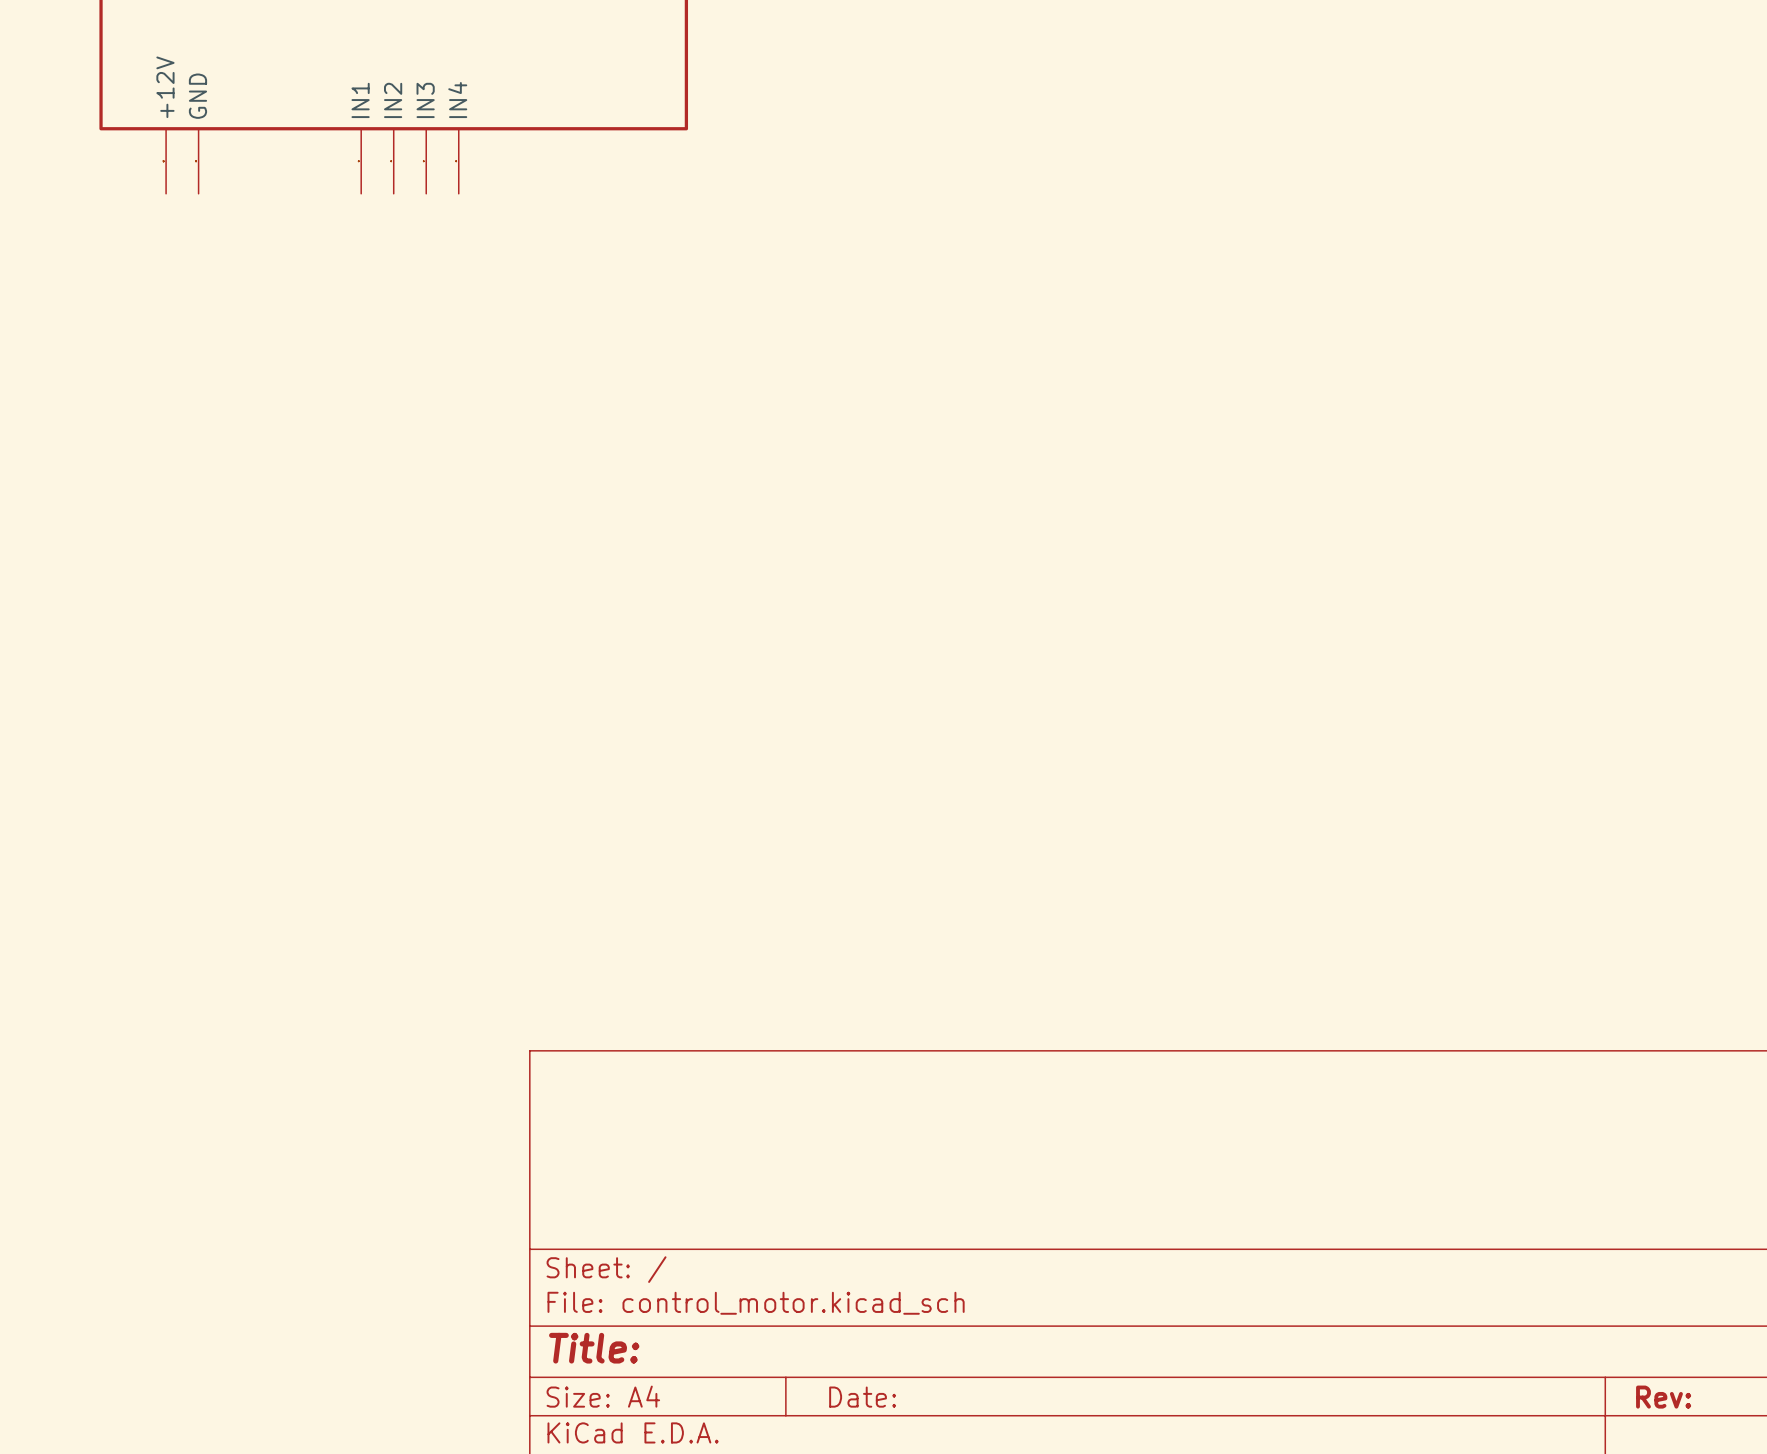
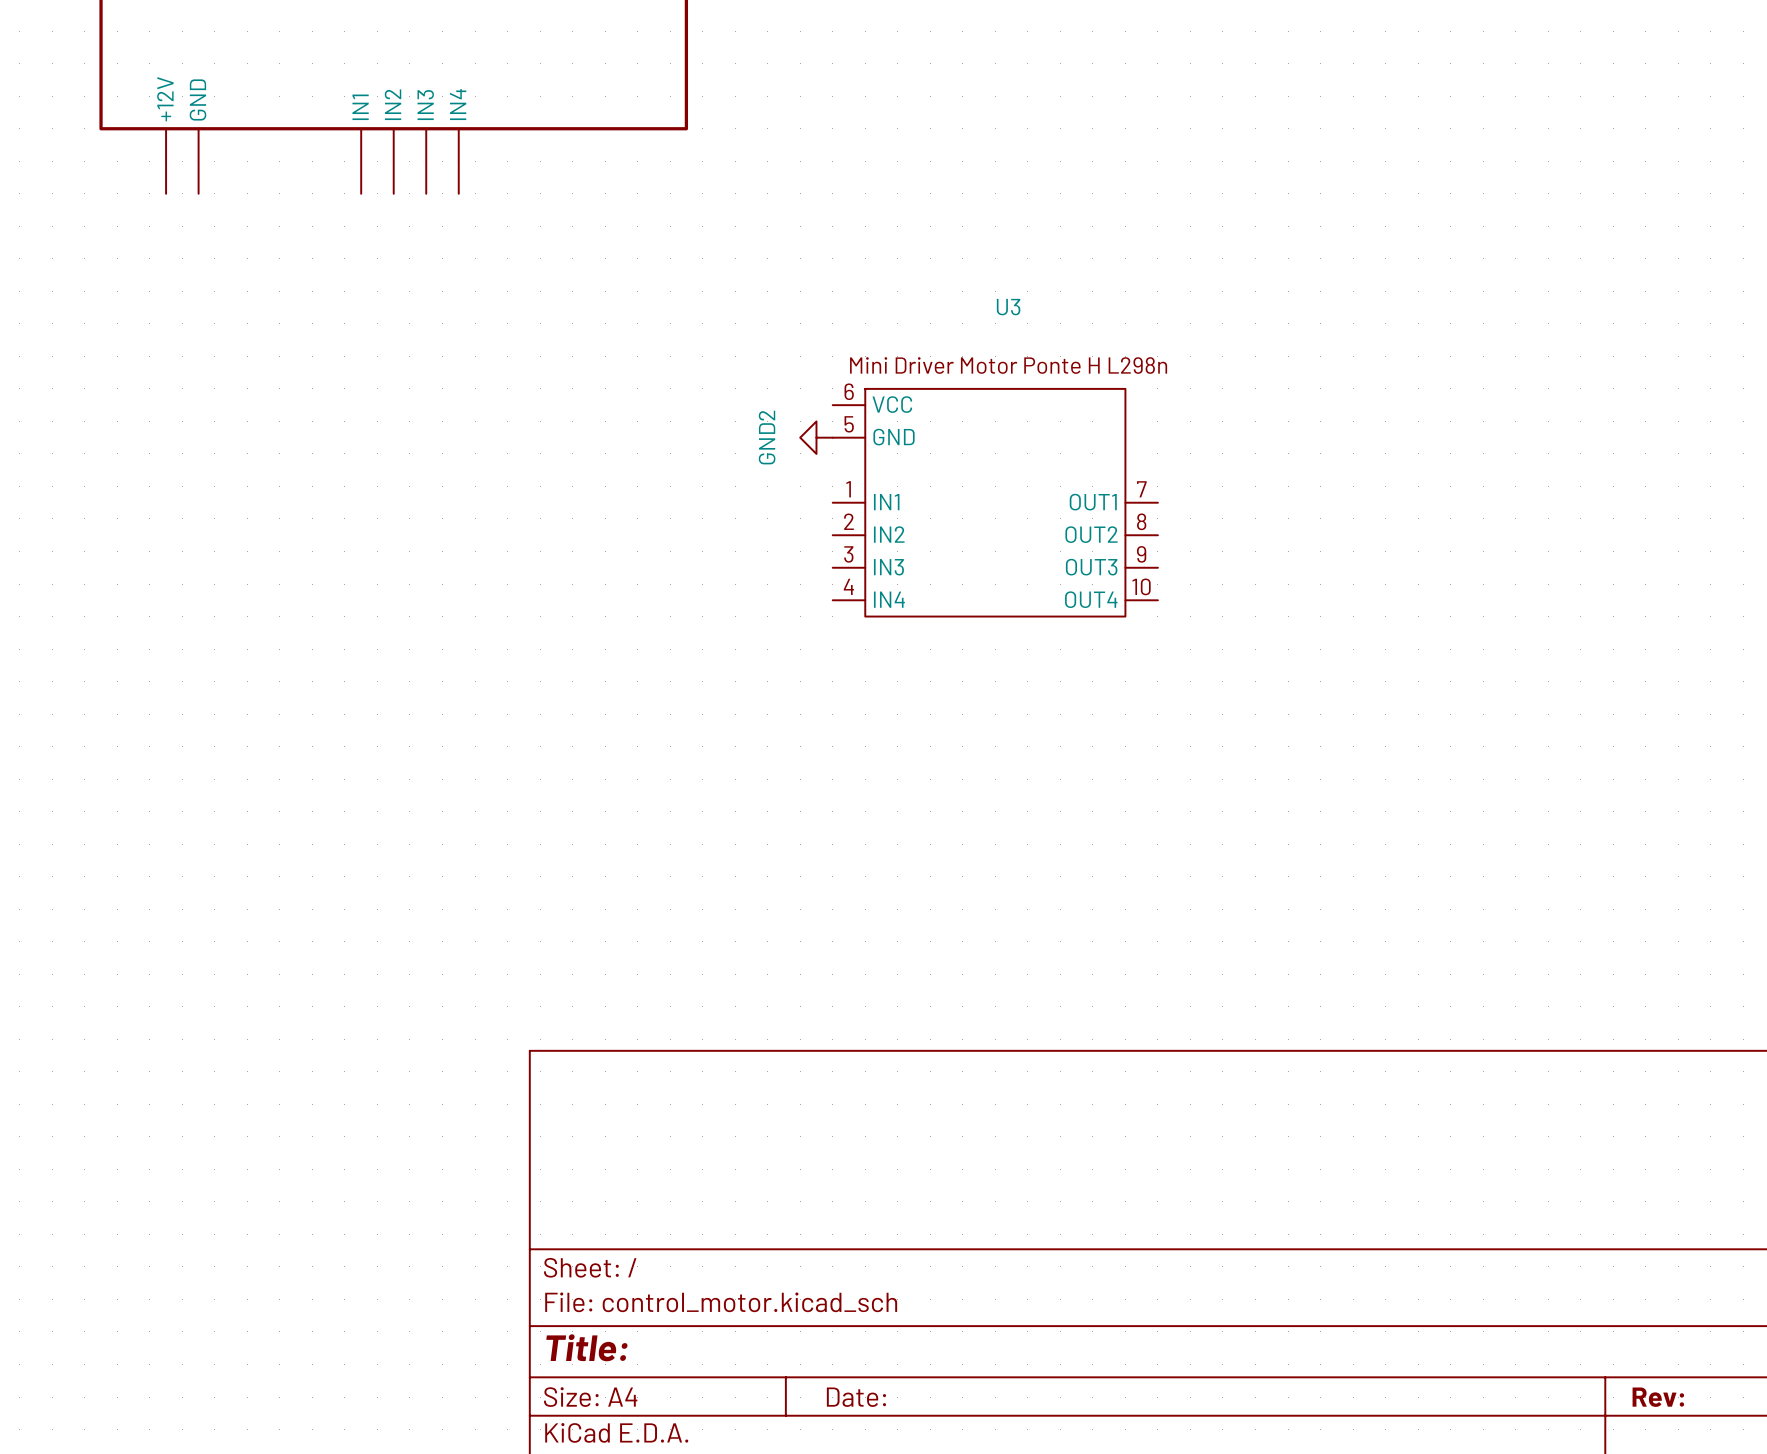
power symbol: none -> GND2 (816, 437)
U3: none -> (995, 502)

